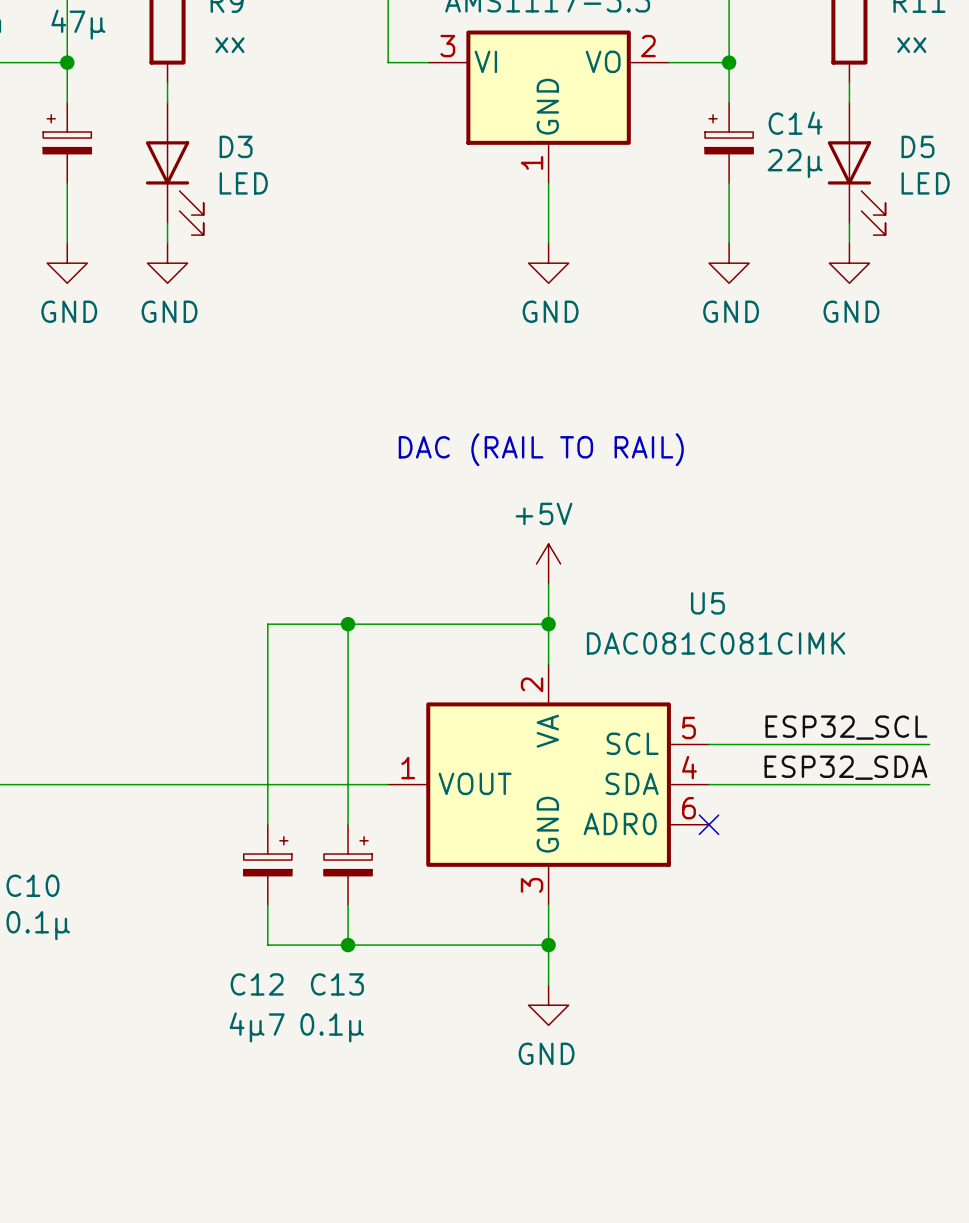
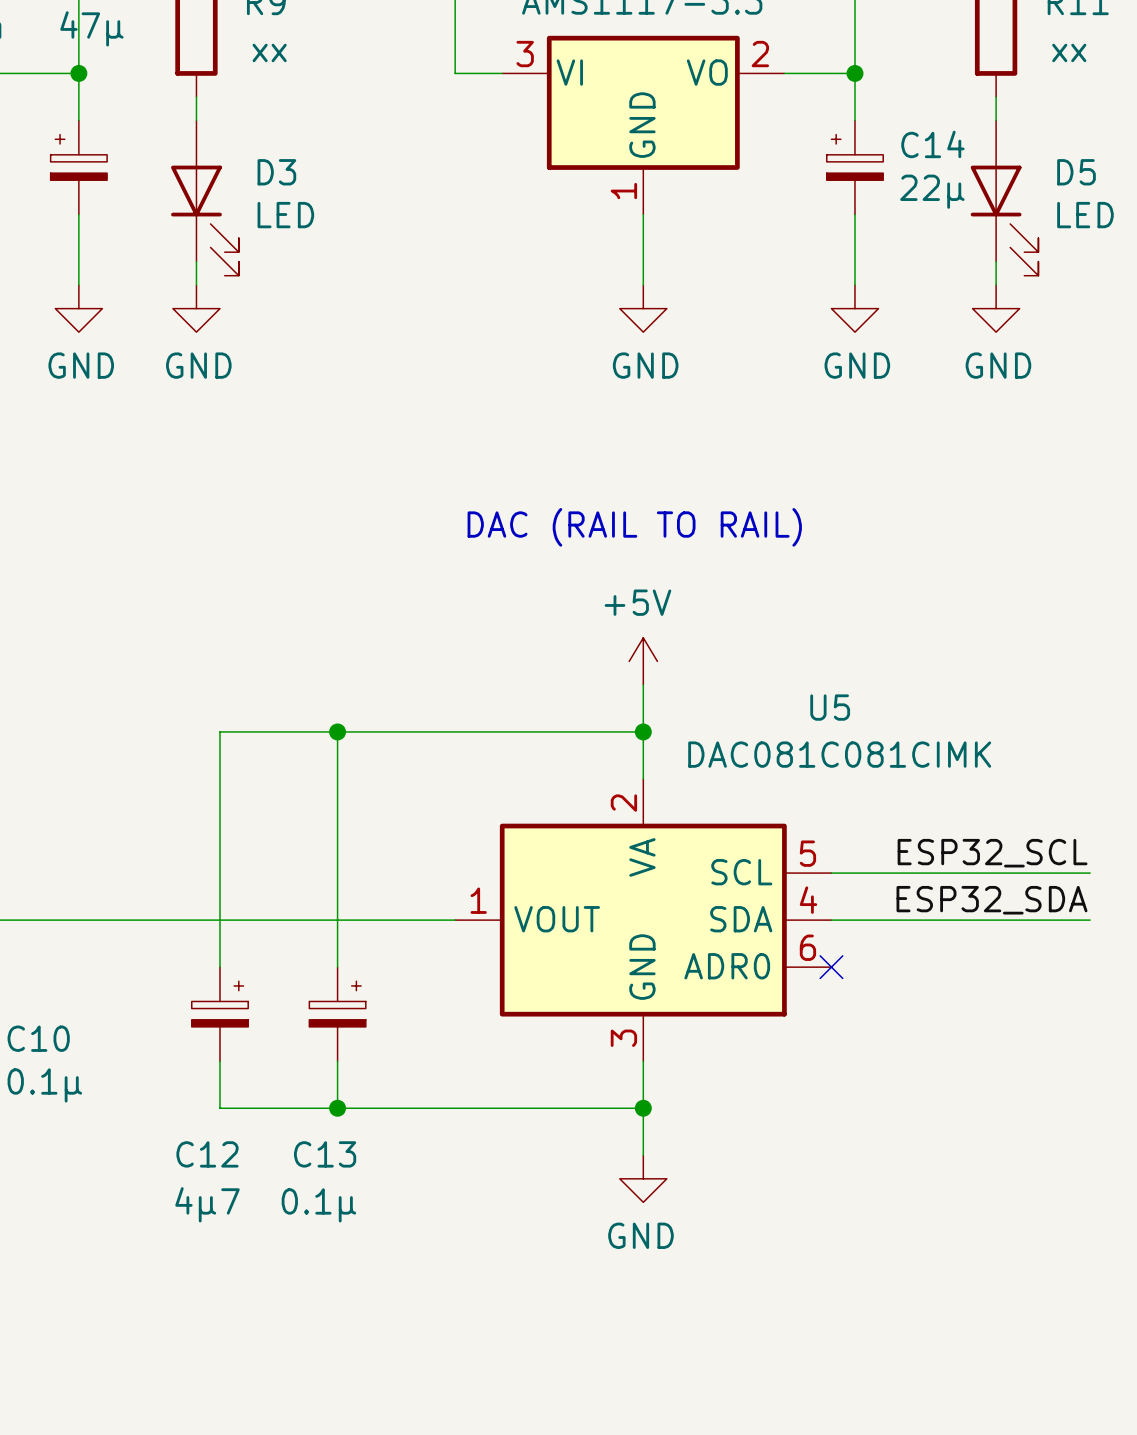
wire: (267, 624) (267, 824) -> (314, 731) (219, 731) (219, 967)
wire: (348, 624) (348, 824) -> (337, 731) (337, 967)
junction position: (348, 624) -> (337, 731)
C12 position: (267, 864) -> (219, 1014)
C13 position: (348, 864) -> (337, 1014)
wire: (267, 904) (267, 945) -> (219, 1061) (219, 1108) (314, 1108)
wire: (348, 904) (348, 945) -> (337, 1061) (337, 1108)
junction position: (348, 945) -> (337, 1108)

